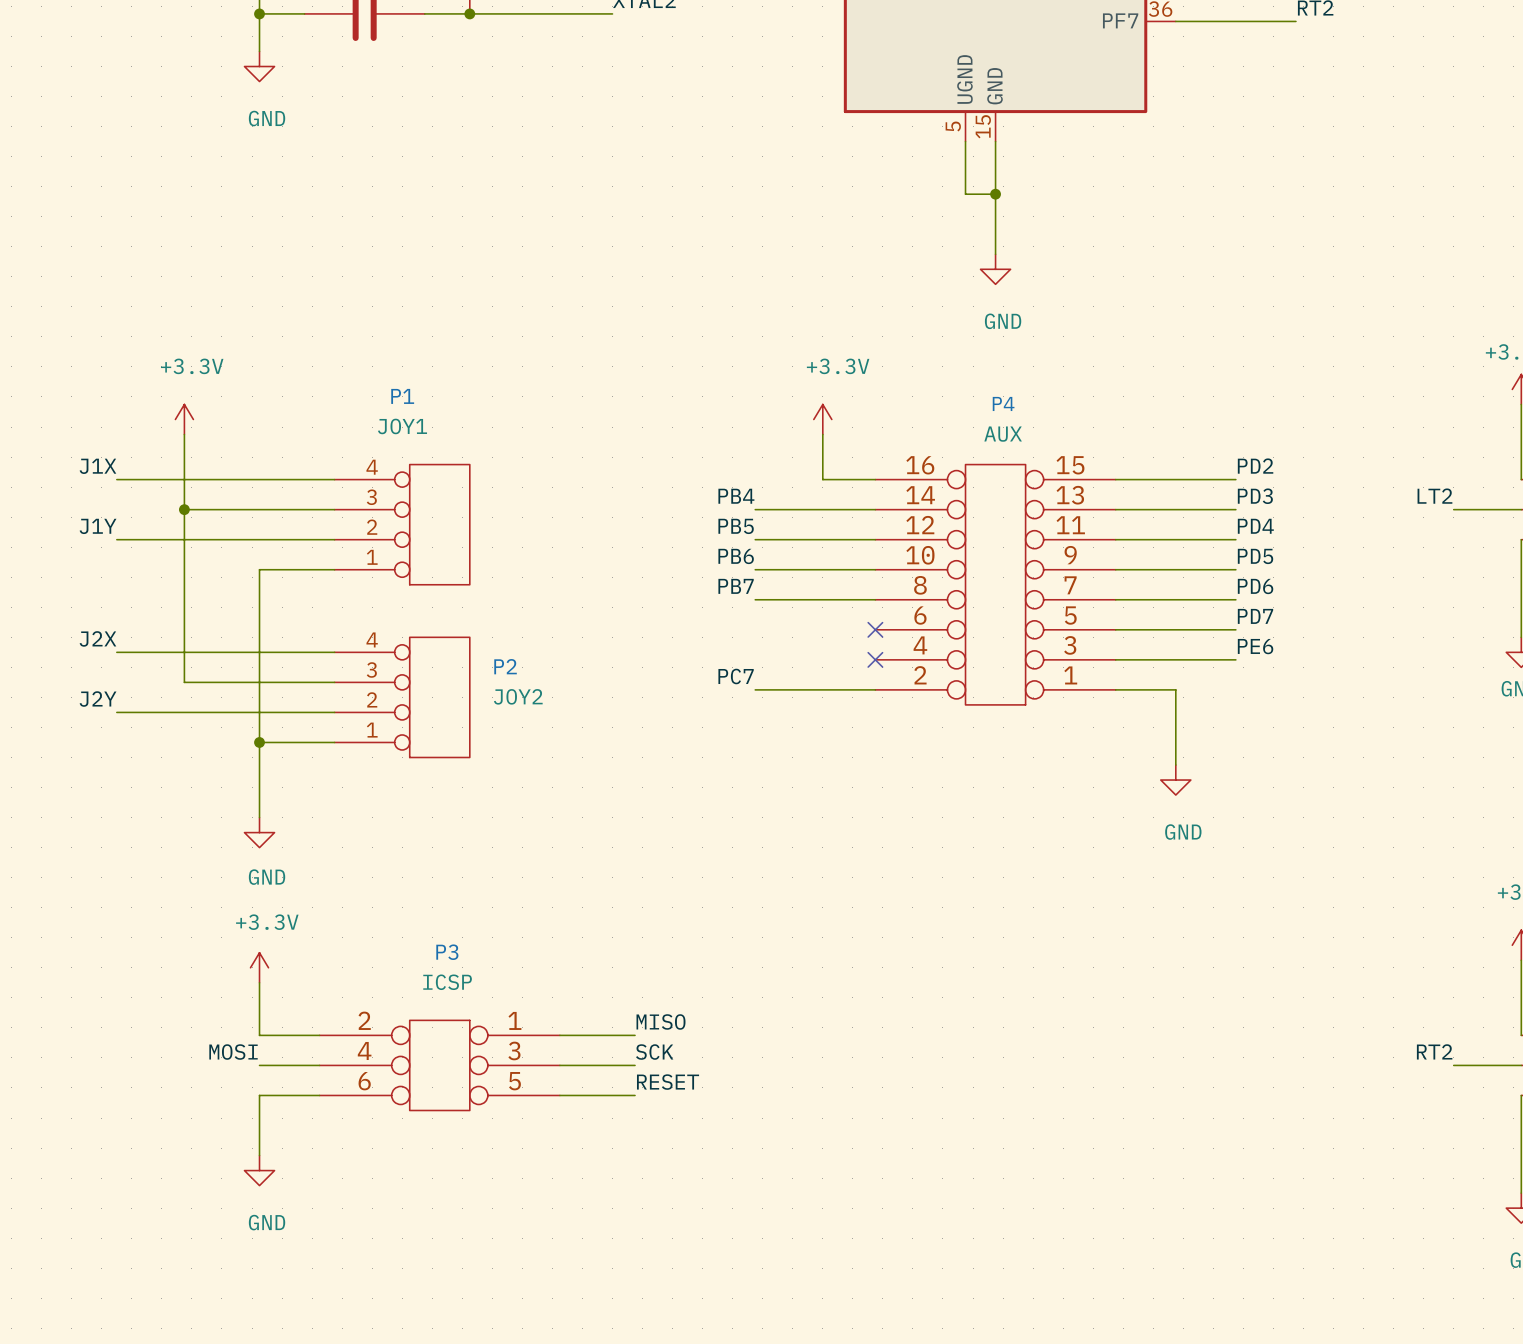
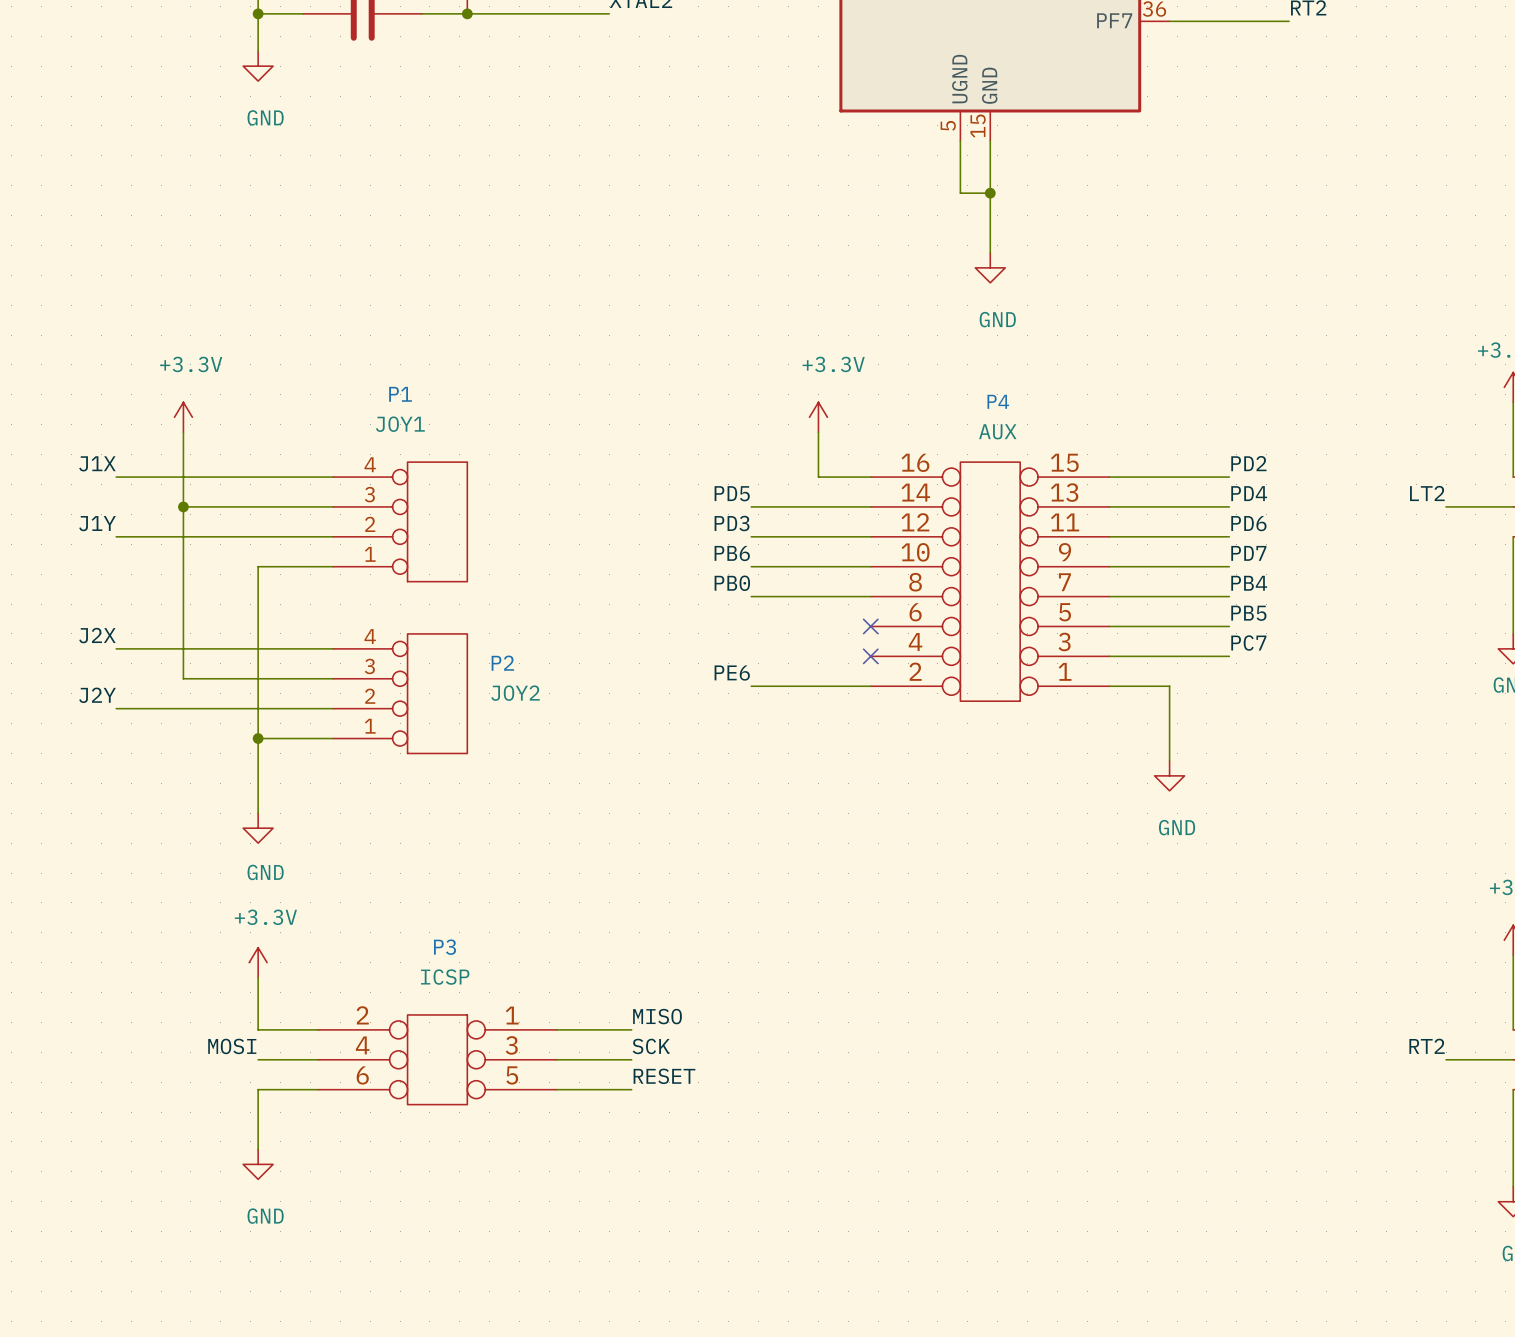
label: PB4 (736, 496) -> PD5 (732, 493)
label: PD3 (1255, 496) -> PD4 (1249, 493)
label: PB5 (736, 526) -> PD3 (732, 523)
label: PD4 (1255, 526) -> PD6 (1248, 523)
label: PD5 (1255, 556) -> PD7 (1248, 553)
label: PB7 (736, 586) -> PB0 (732, 583)
label: PD6 (1255, 586) -> PB4 (1249, 583)
label: PD7 (1255, 616) -> PB5 (1248, 613)
label: PE6 (1255, 646) -> PC7 (1248, 643)
label: PC7 (736, 676) -> PE6 (732, 673)

